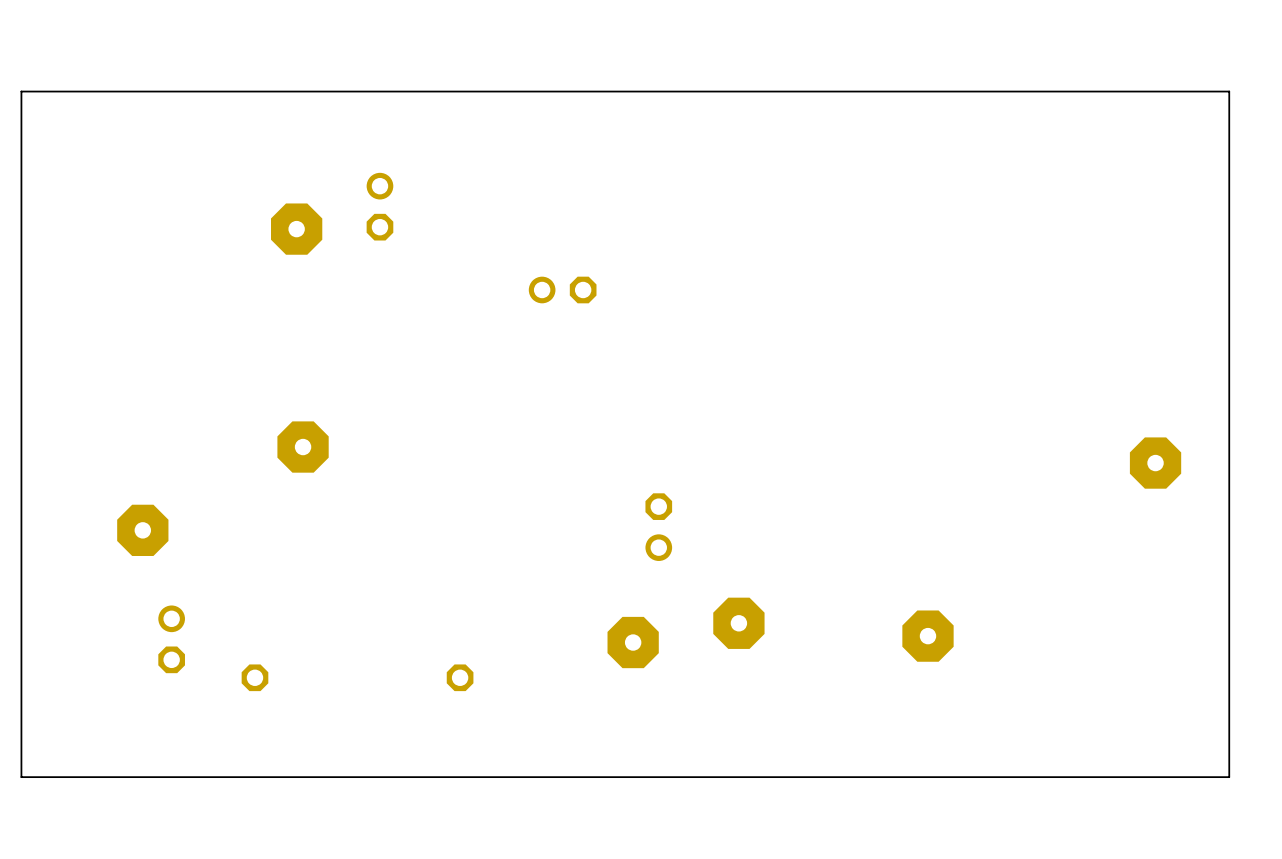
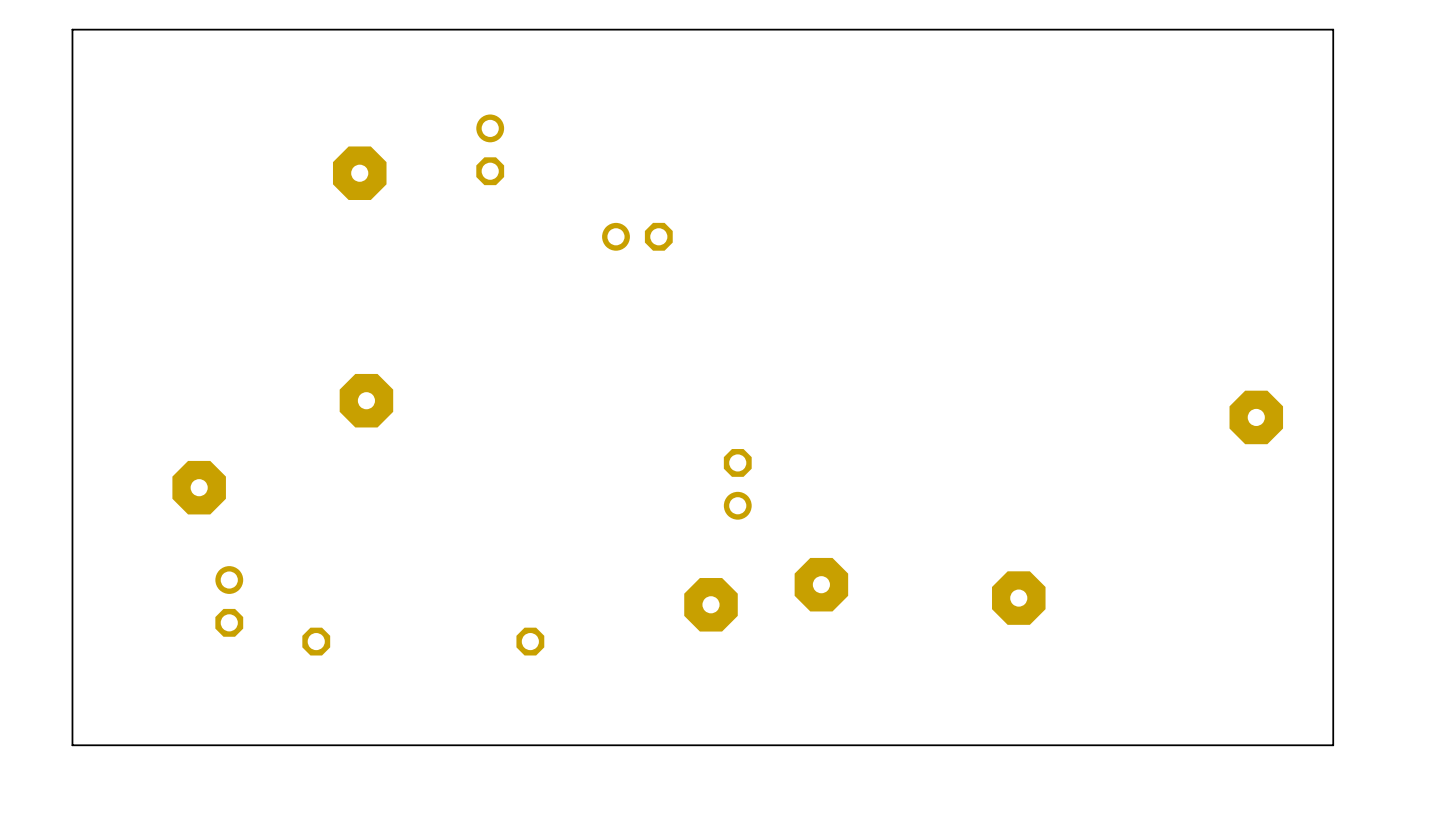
part position: (379, 206) -> (490, 149)

